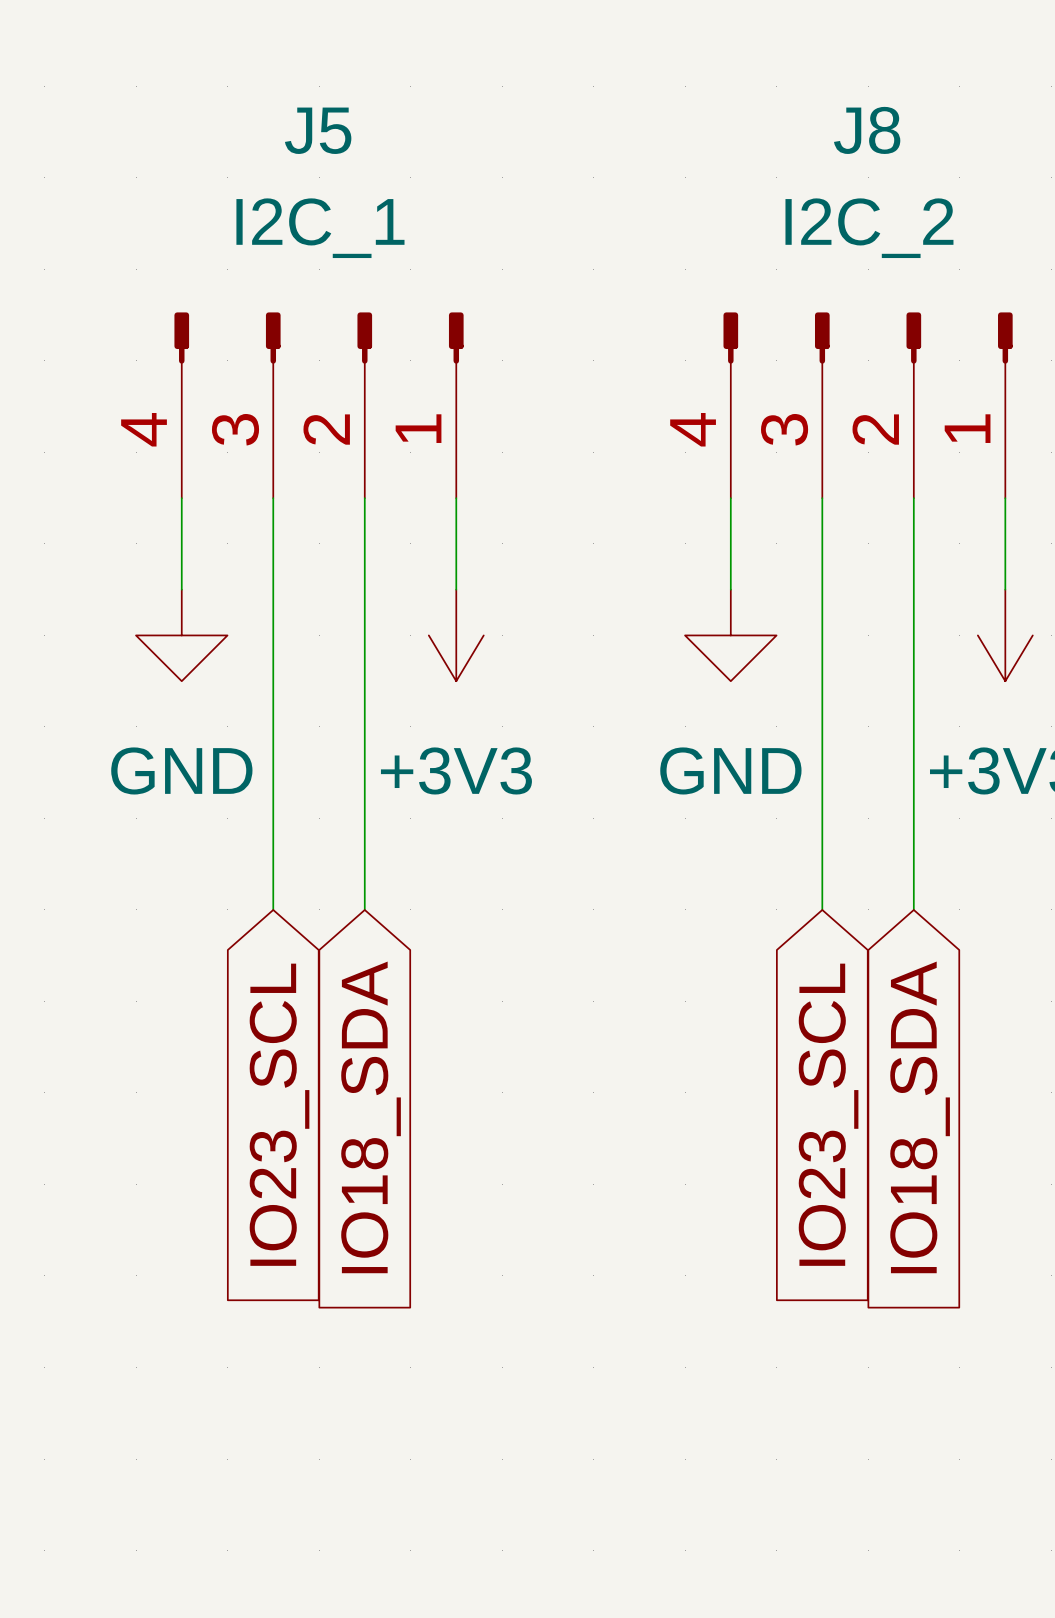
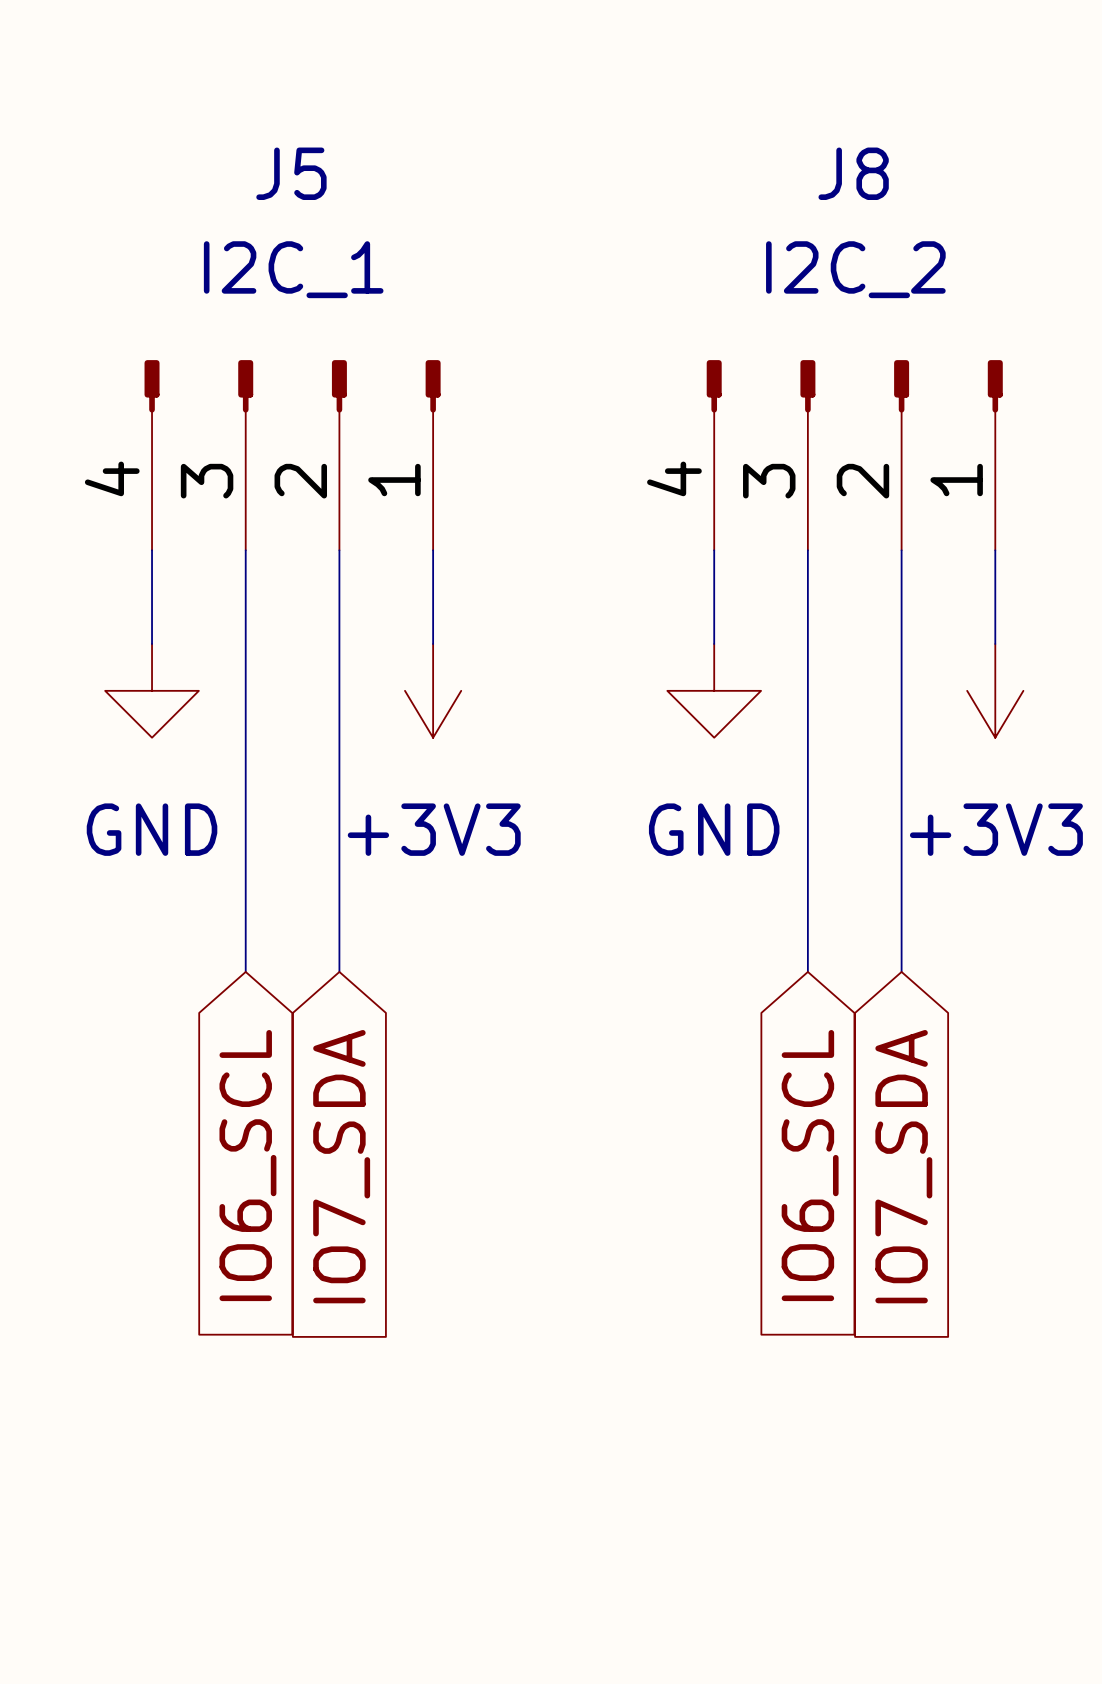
global label: IO23_SCL (279, 1114) -> IO6_SCL (247, 1165)
global label: IO23_SCL (828, 1114) -> IO6_SCL (810, 1165)
global label: IO18_SDA (371, 1117) -> IO7_SDA (341, 1166)
global label: IO18_SDA (920, 1117) -> IO7_SDA (903, 1166)

